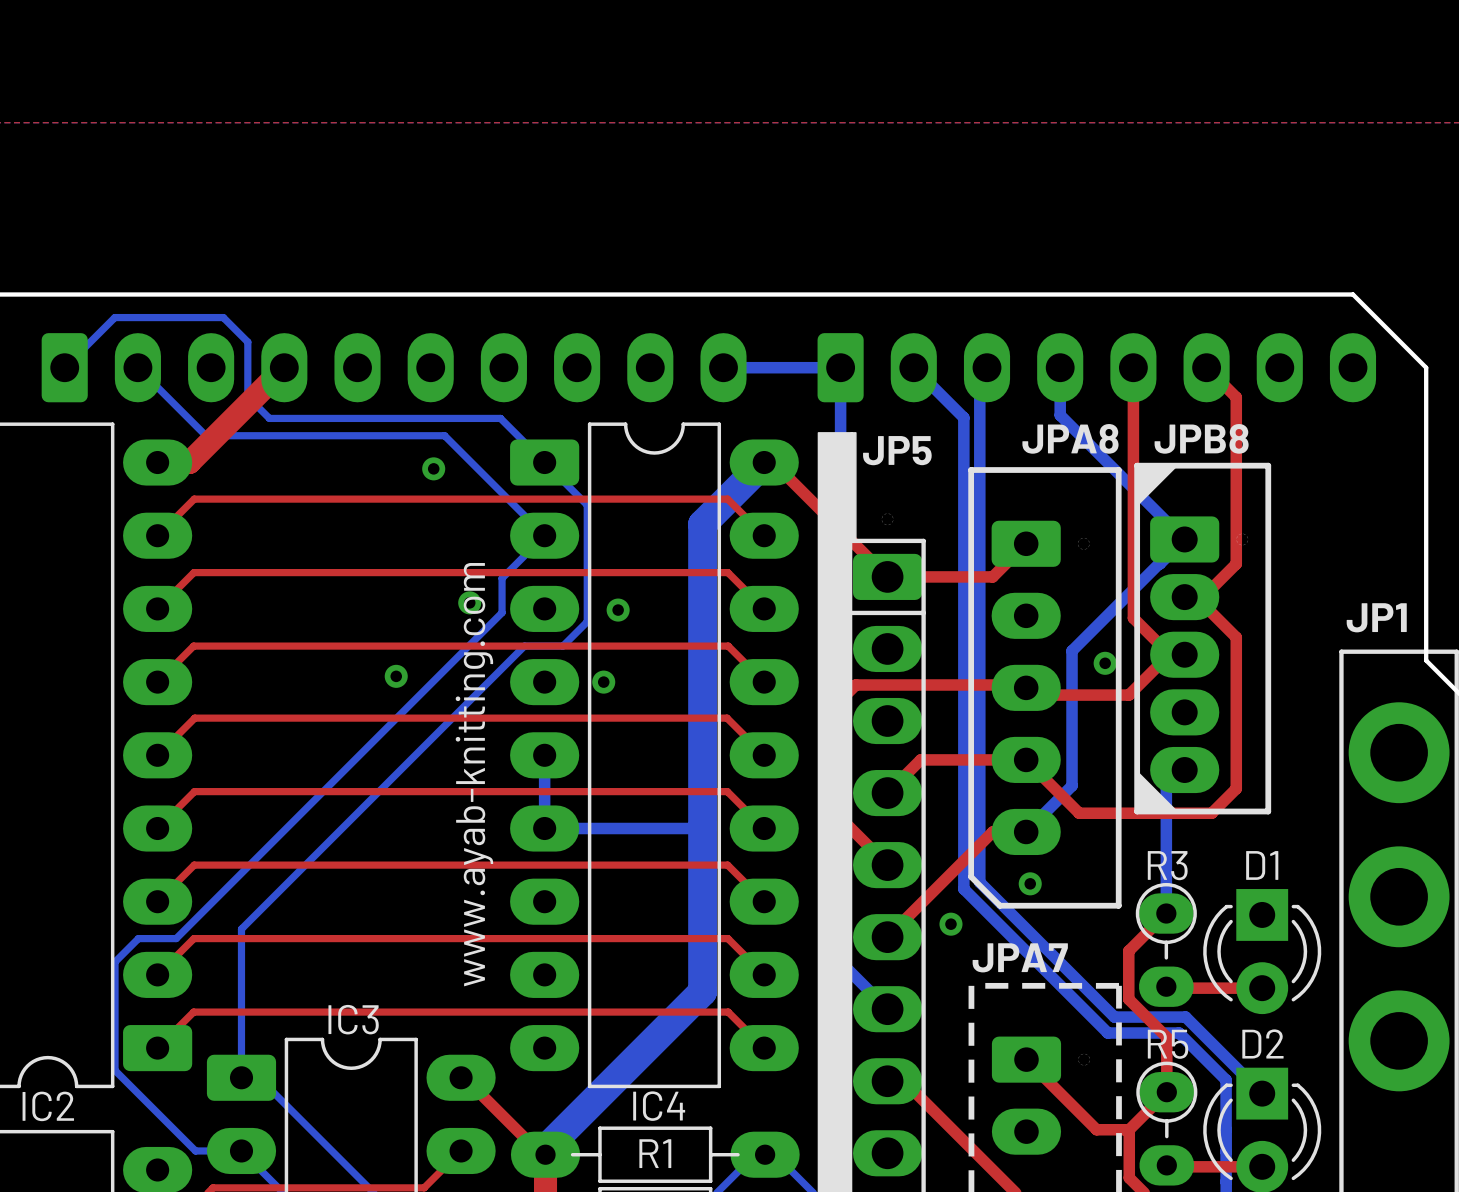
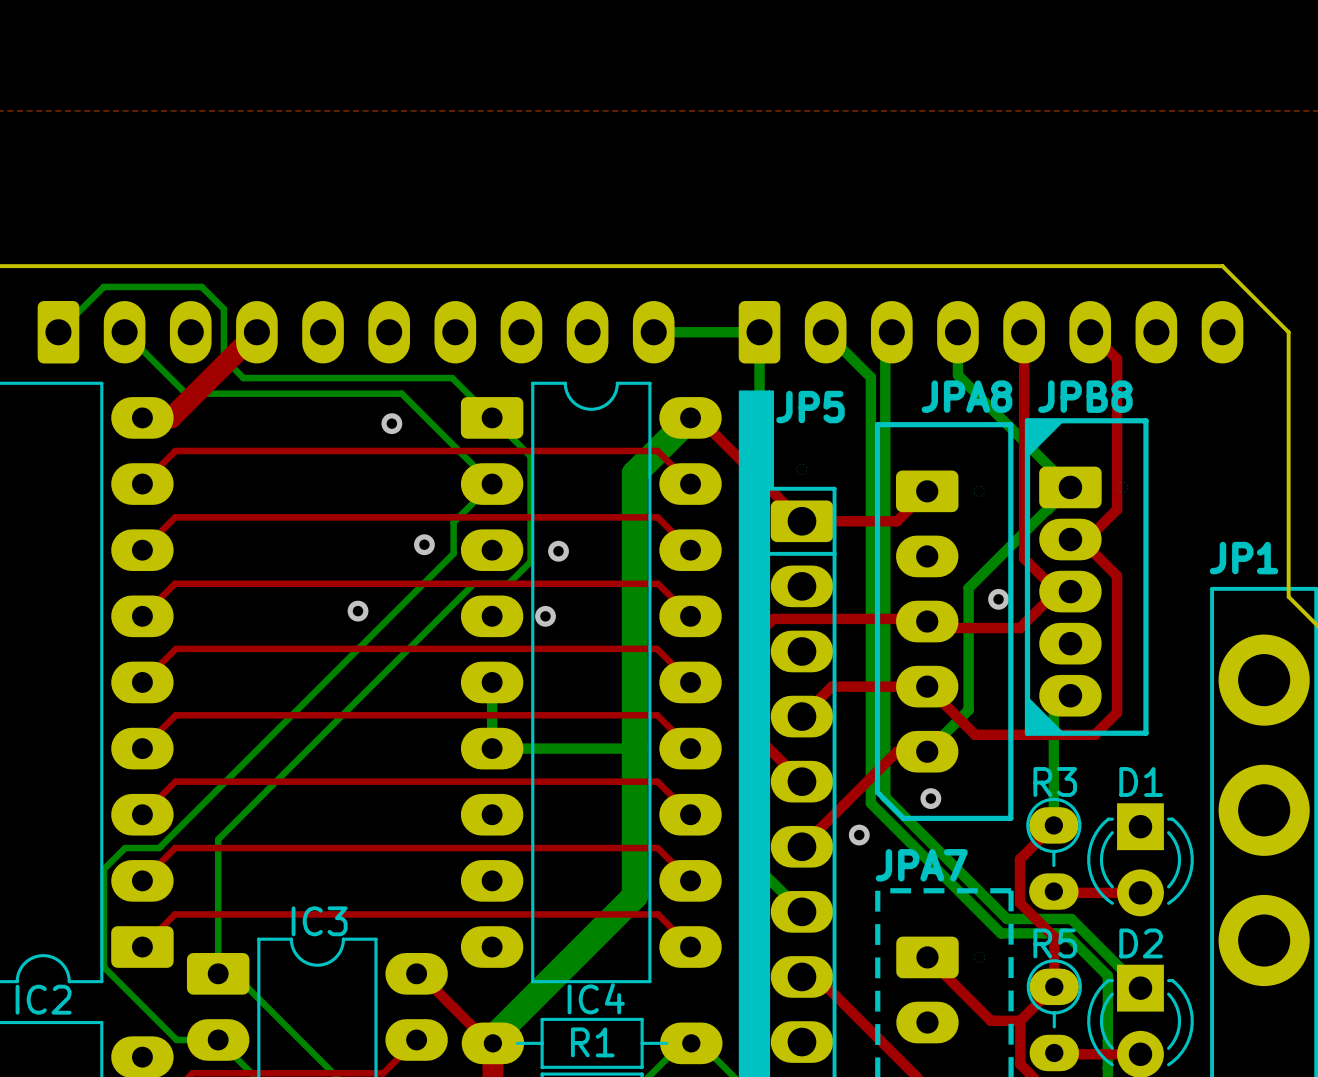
text: www.ayab-knitting.com (474, 774) -> none

